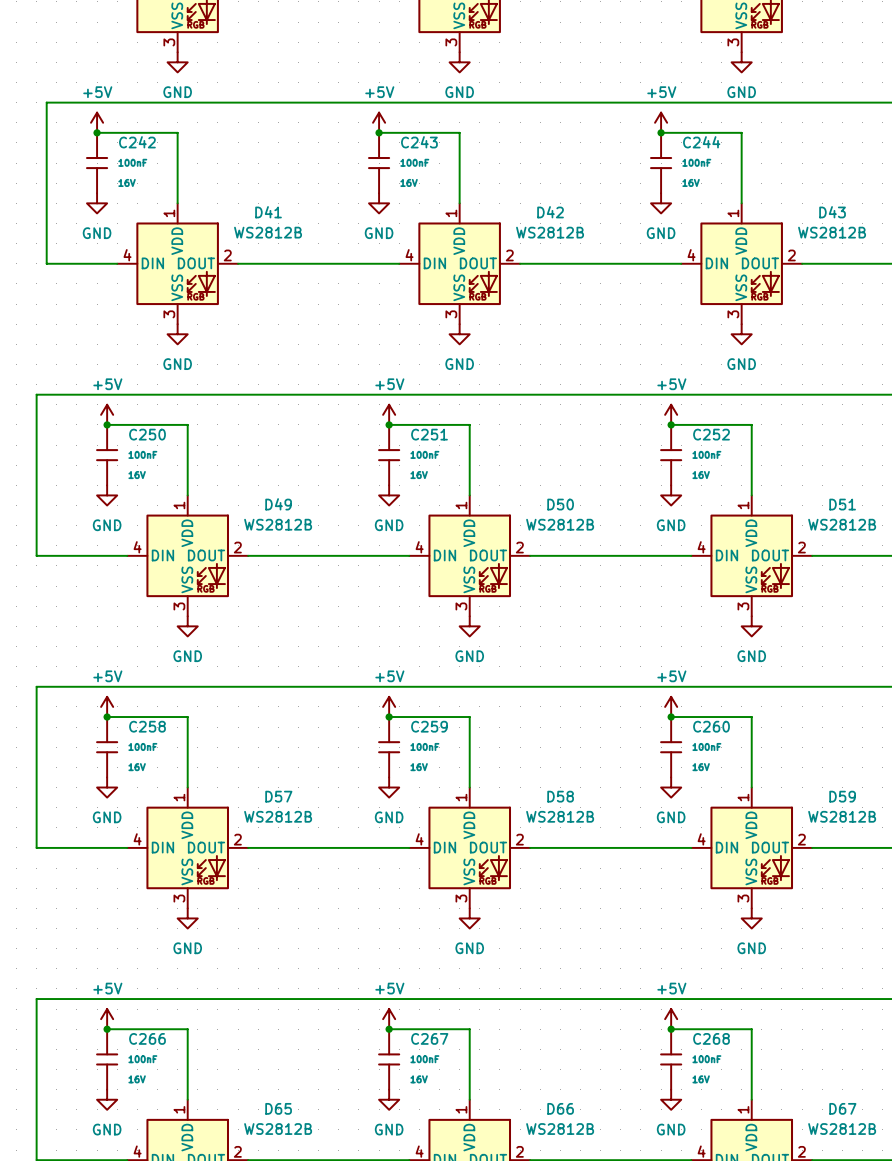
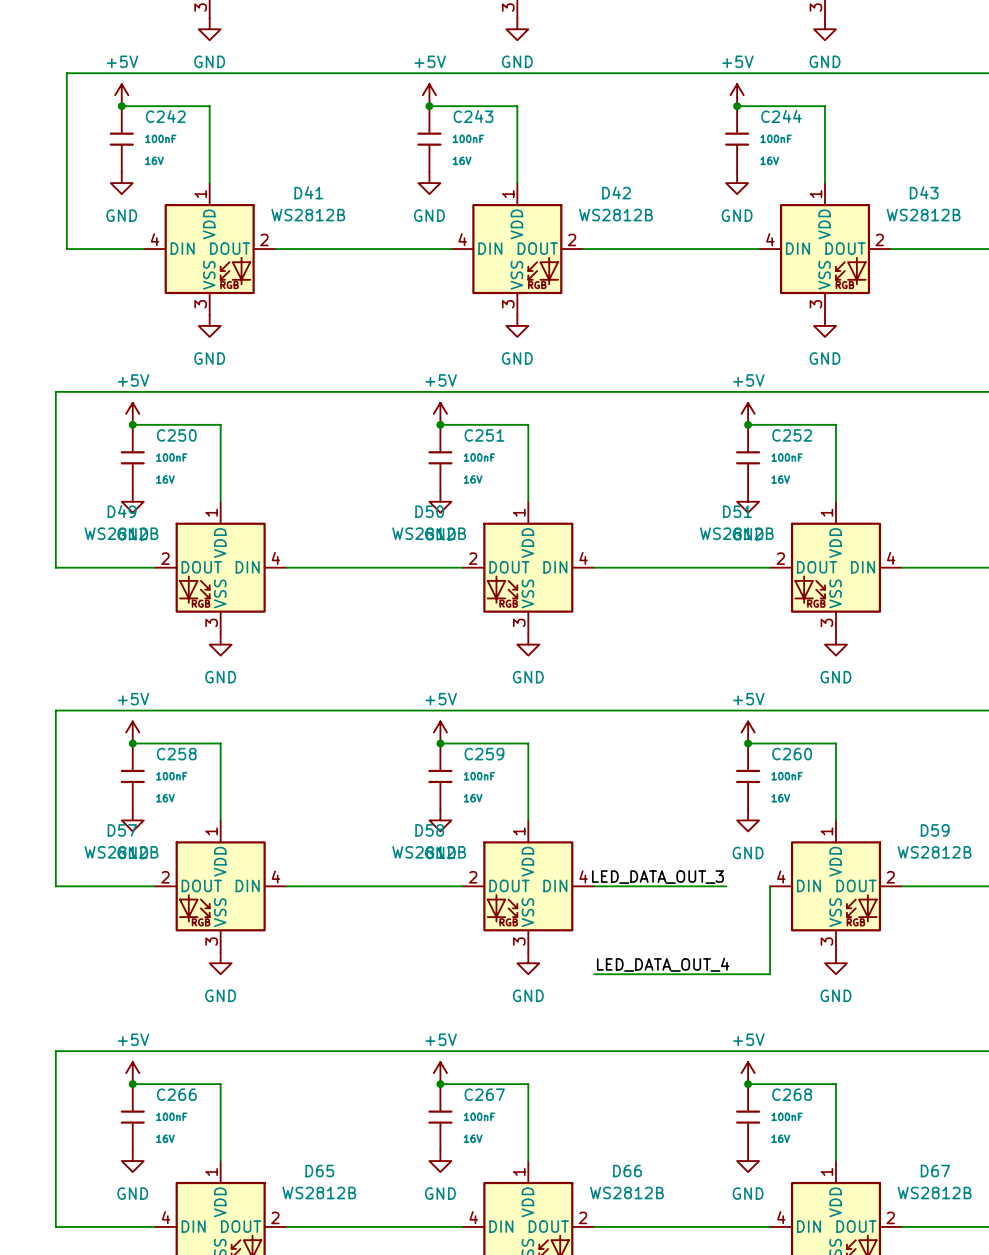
D49 flip: as is (187, 555) -> left-right (220, 567)
D50 flip: as is (469, 555) -> left-right (528, 567)
D51 flip: as is (751, 555) -> left-right (835, 567)
label: none -> LED_DATA_OUT_3 (658, 877)
D57 flip: as is (187, 847) -> left-right (220, 886)
D58 flip: as is (469, 847) -> left-right (528, 886)
wire: (651, 847) (691, 847) -> (594, 974) (770, 974) (770, 886)
label: none -> LED_DATA_OUT_4 (663, 964)

